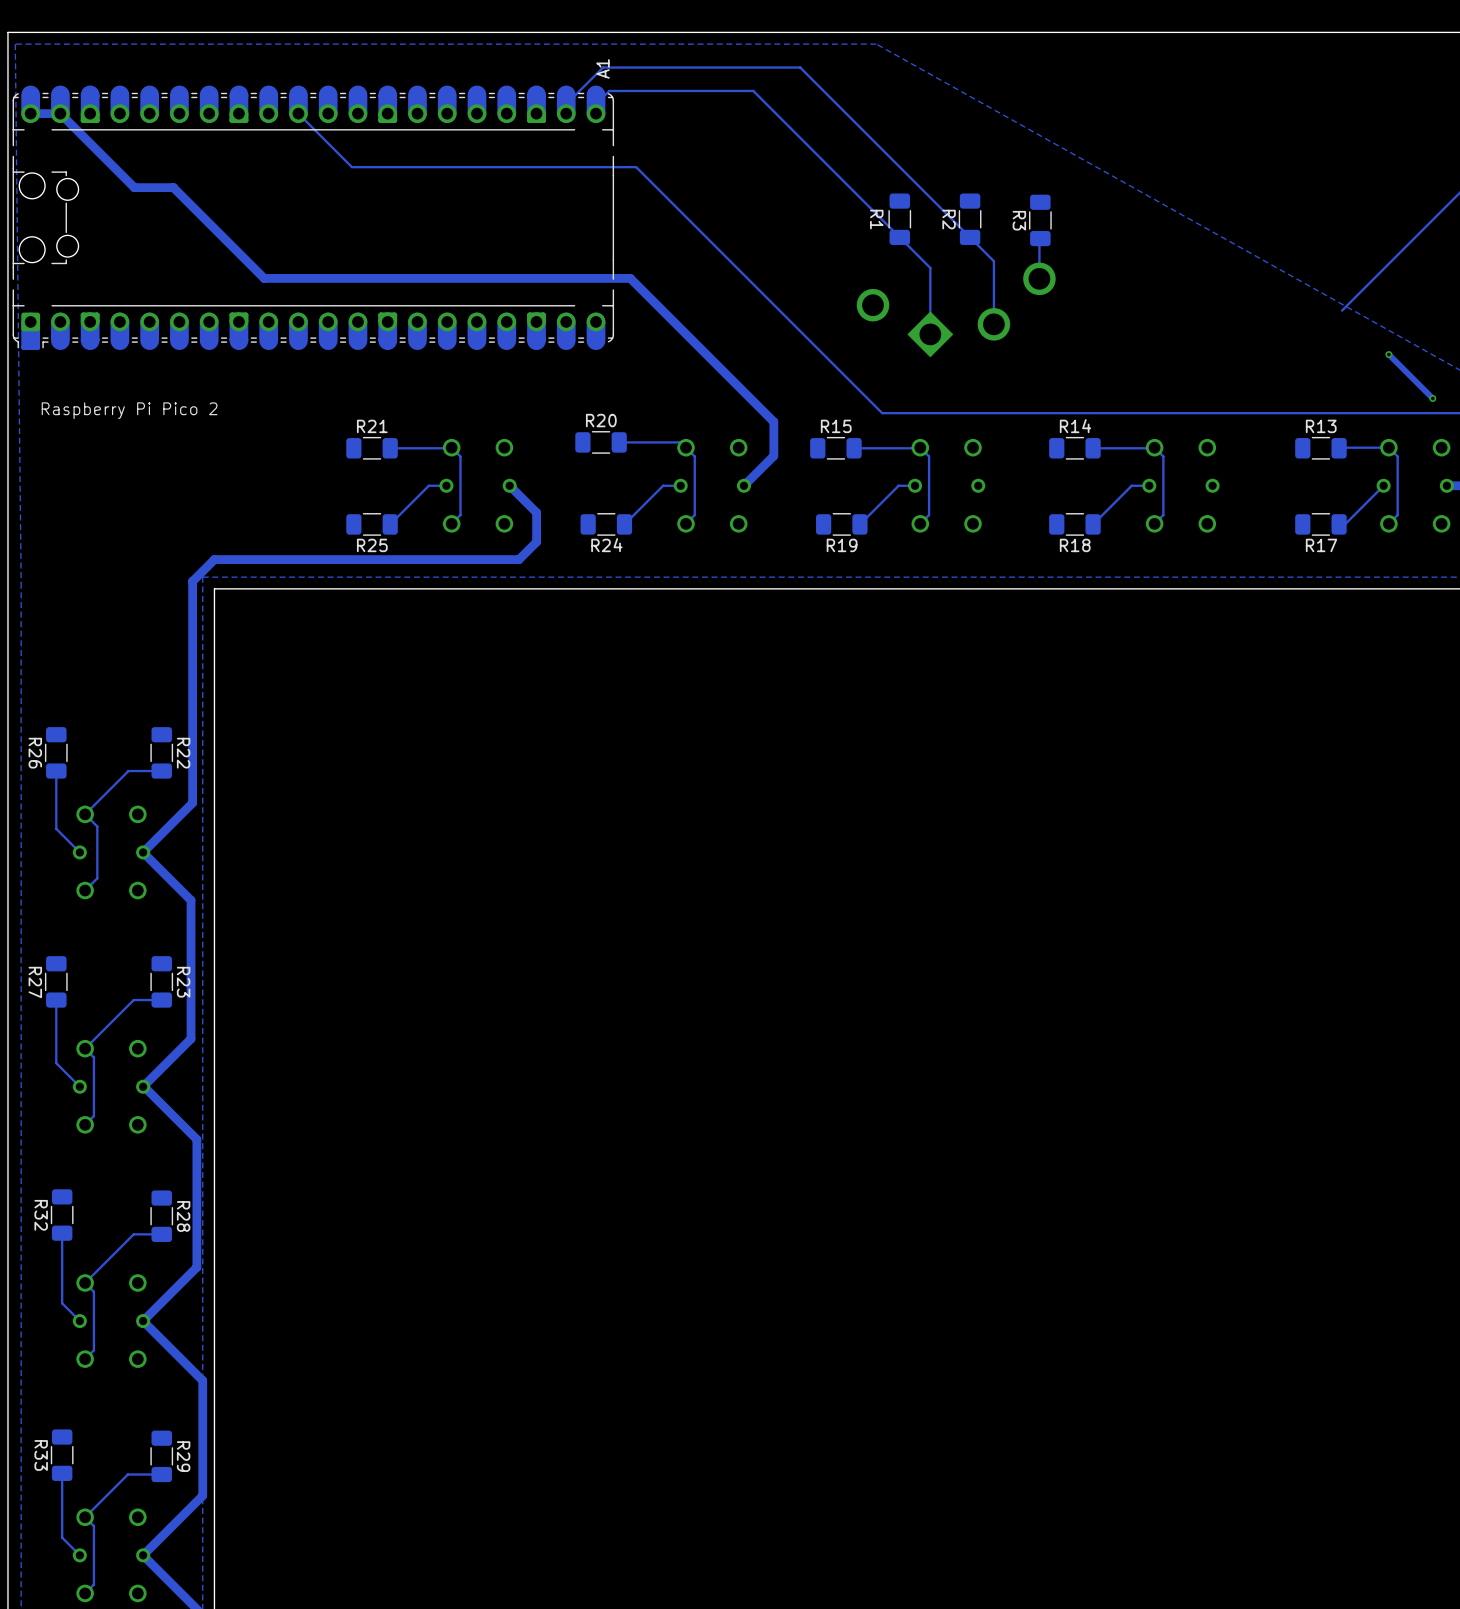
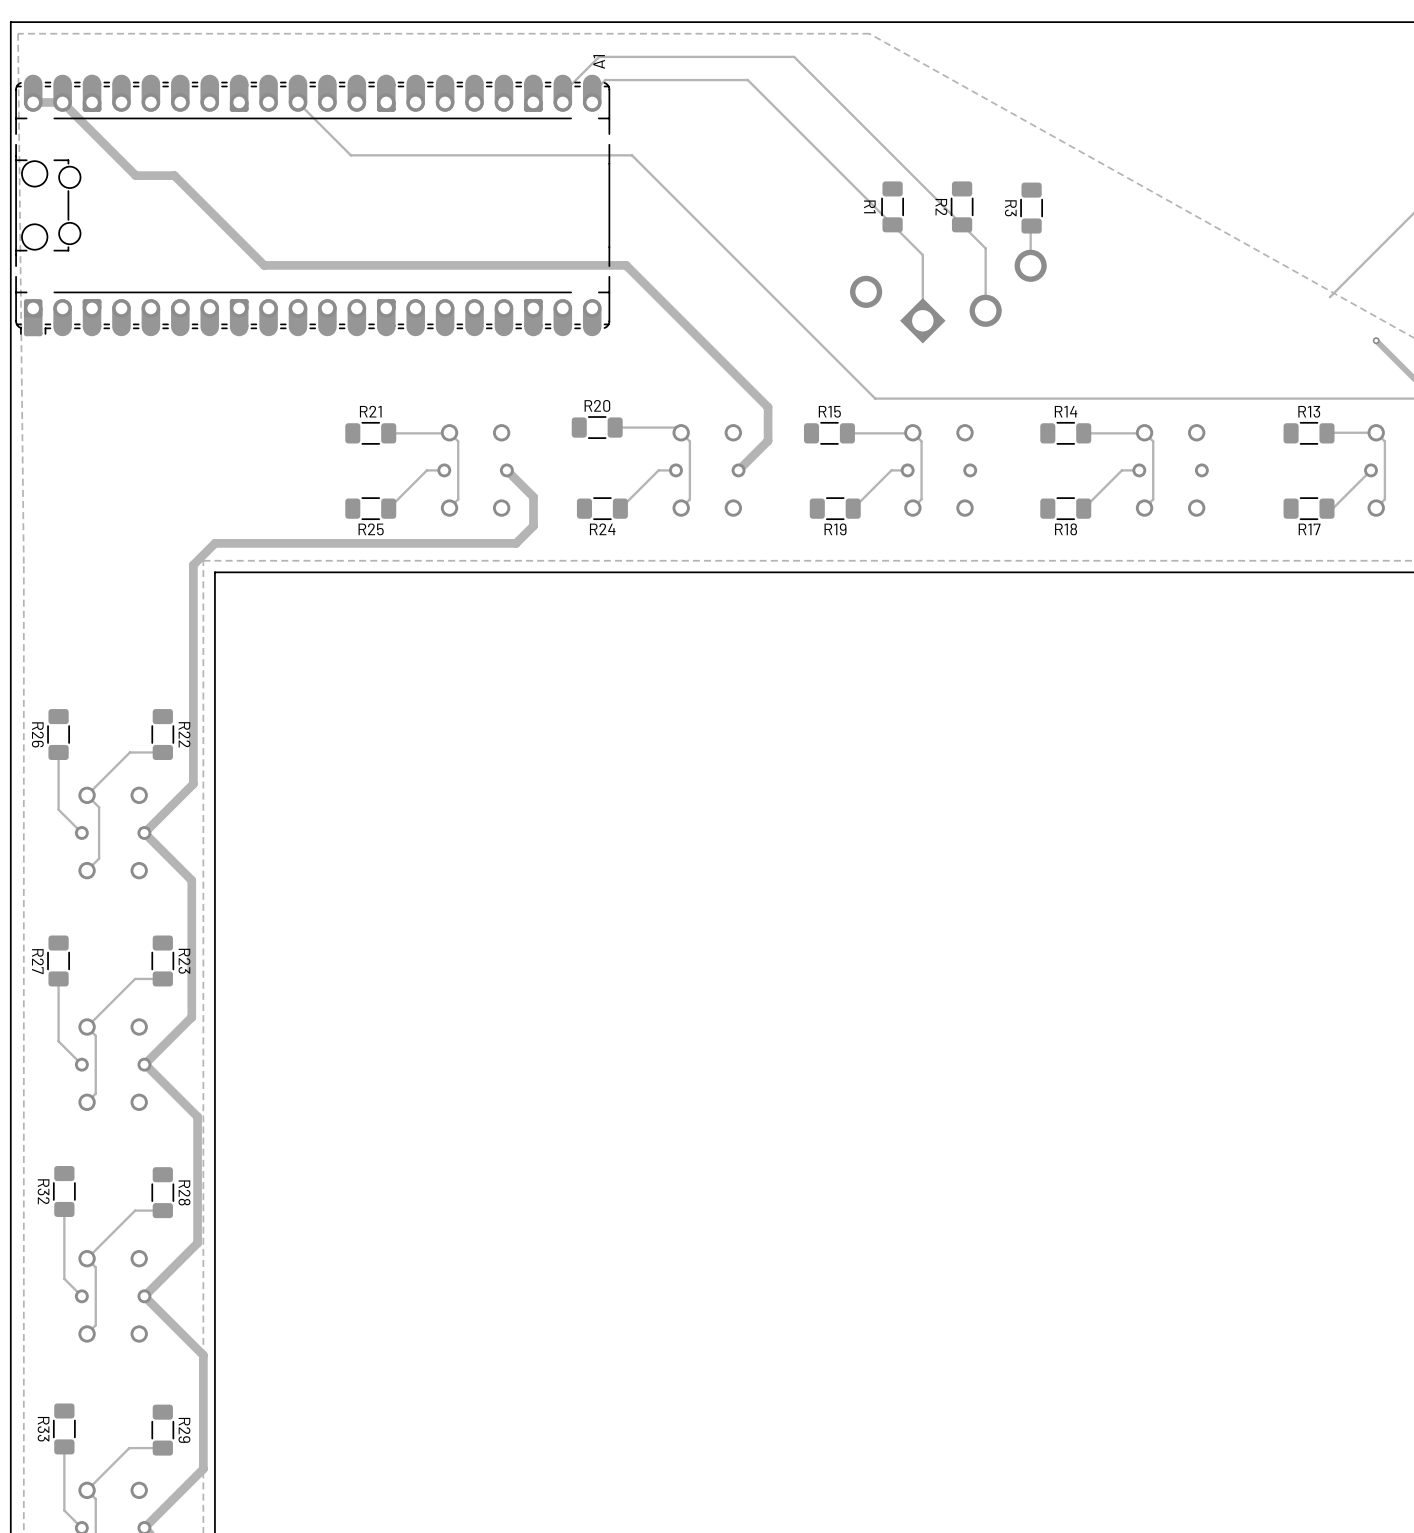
text: Raspberry Pi Pico 2 (129, 410) -> none

